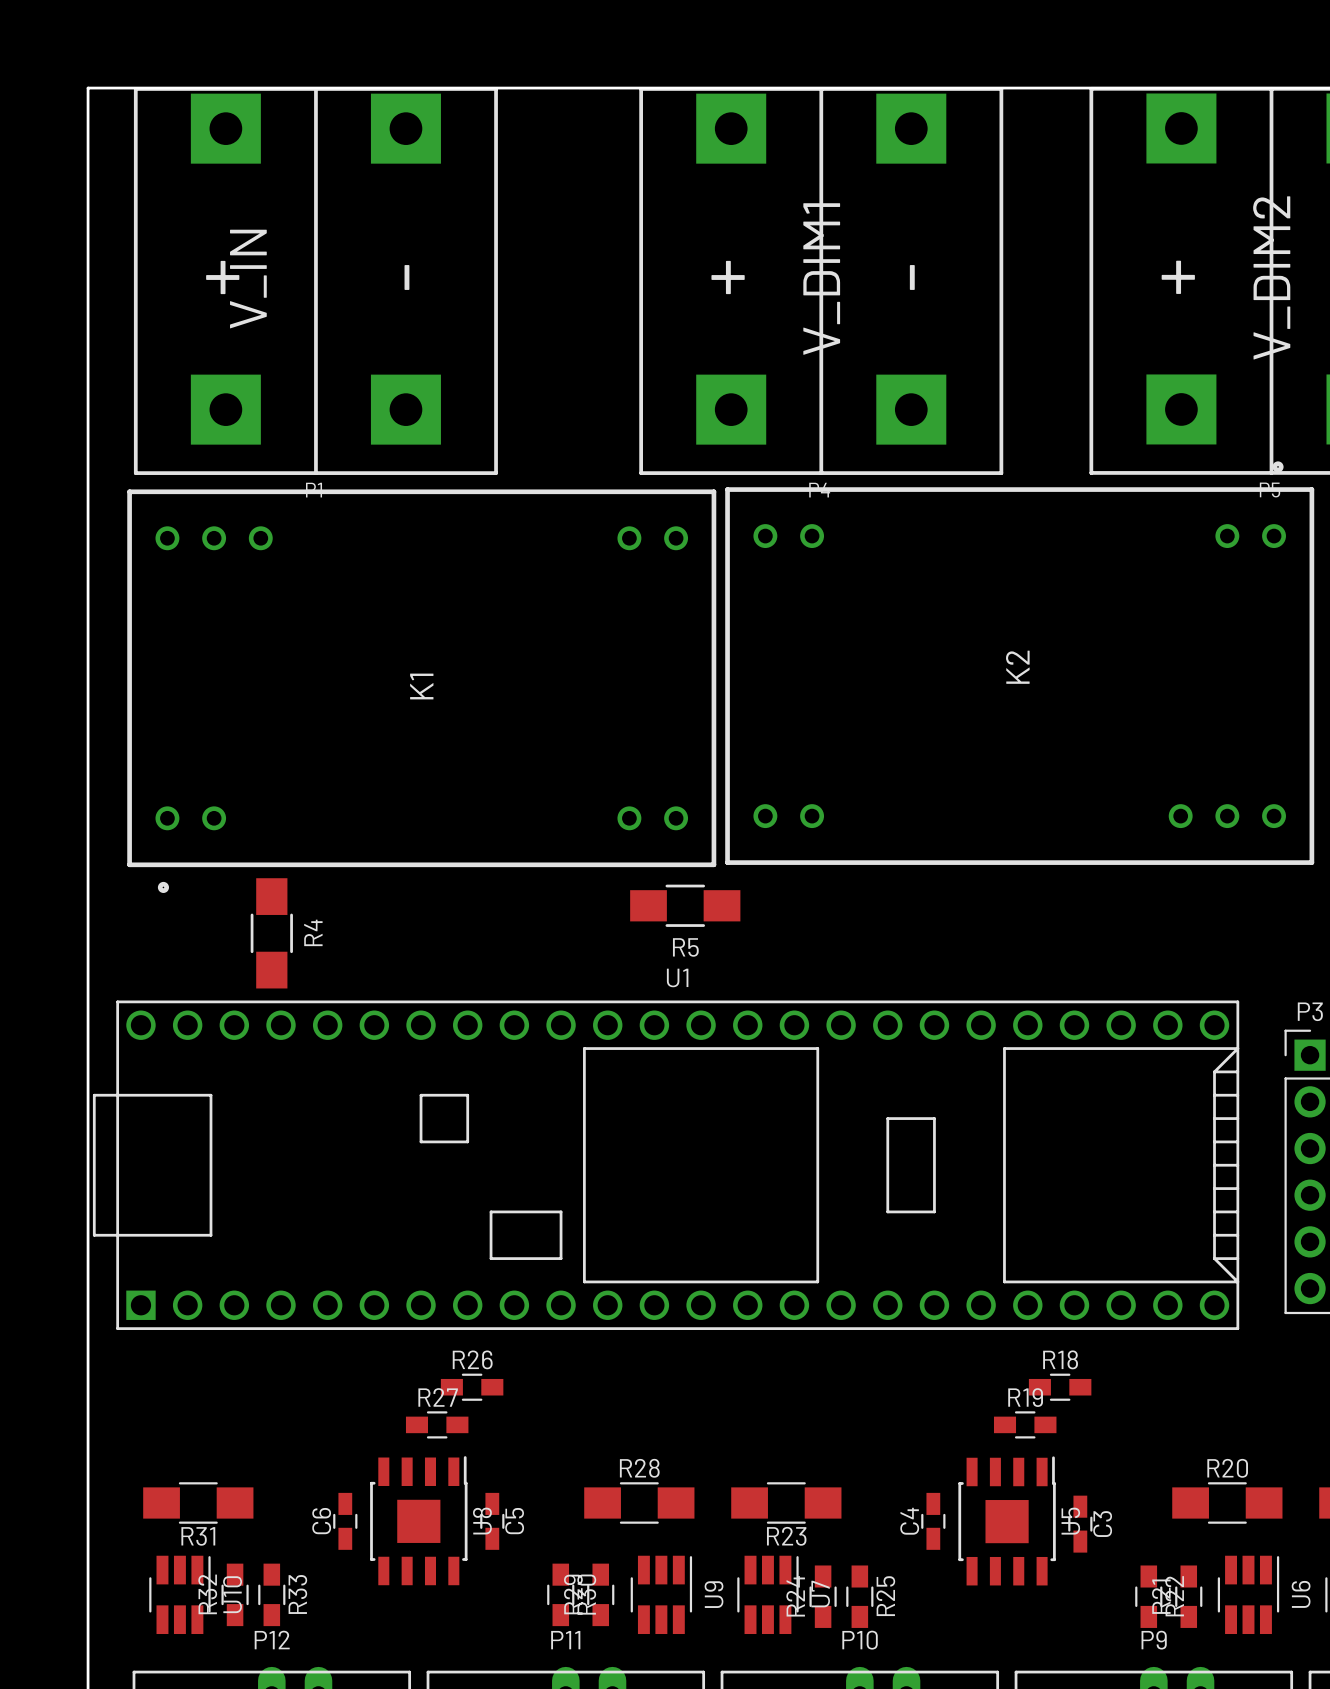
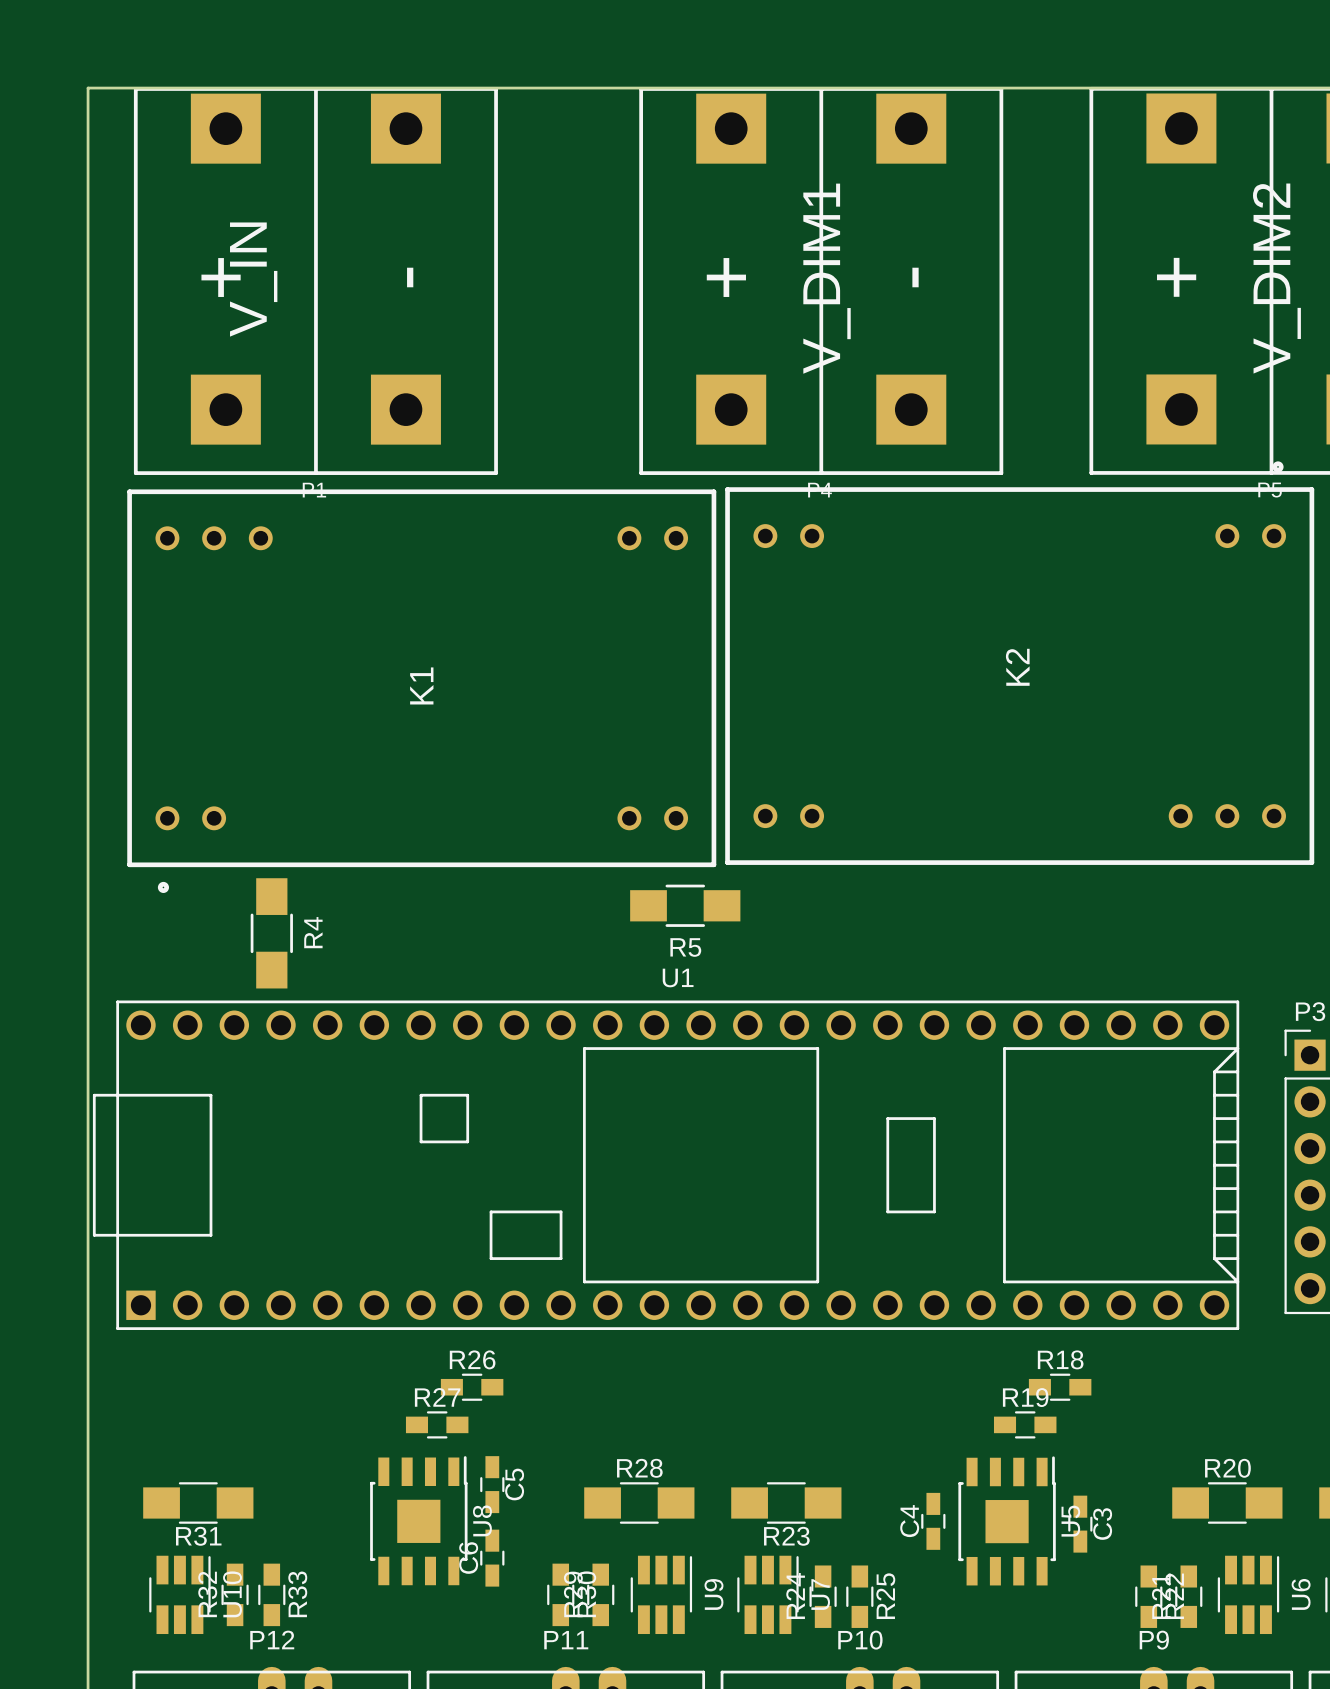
C6 position: (345, 1521) -> (492, 1558)
C5 position: (492, 1521) -> (492, 1484)

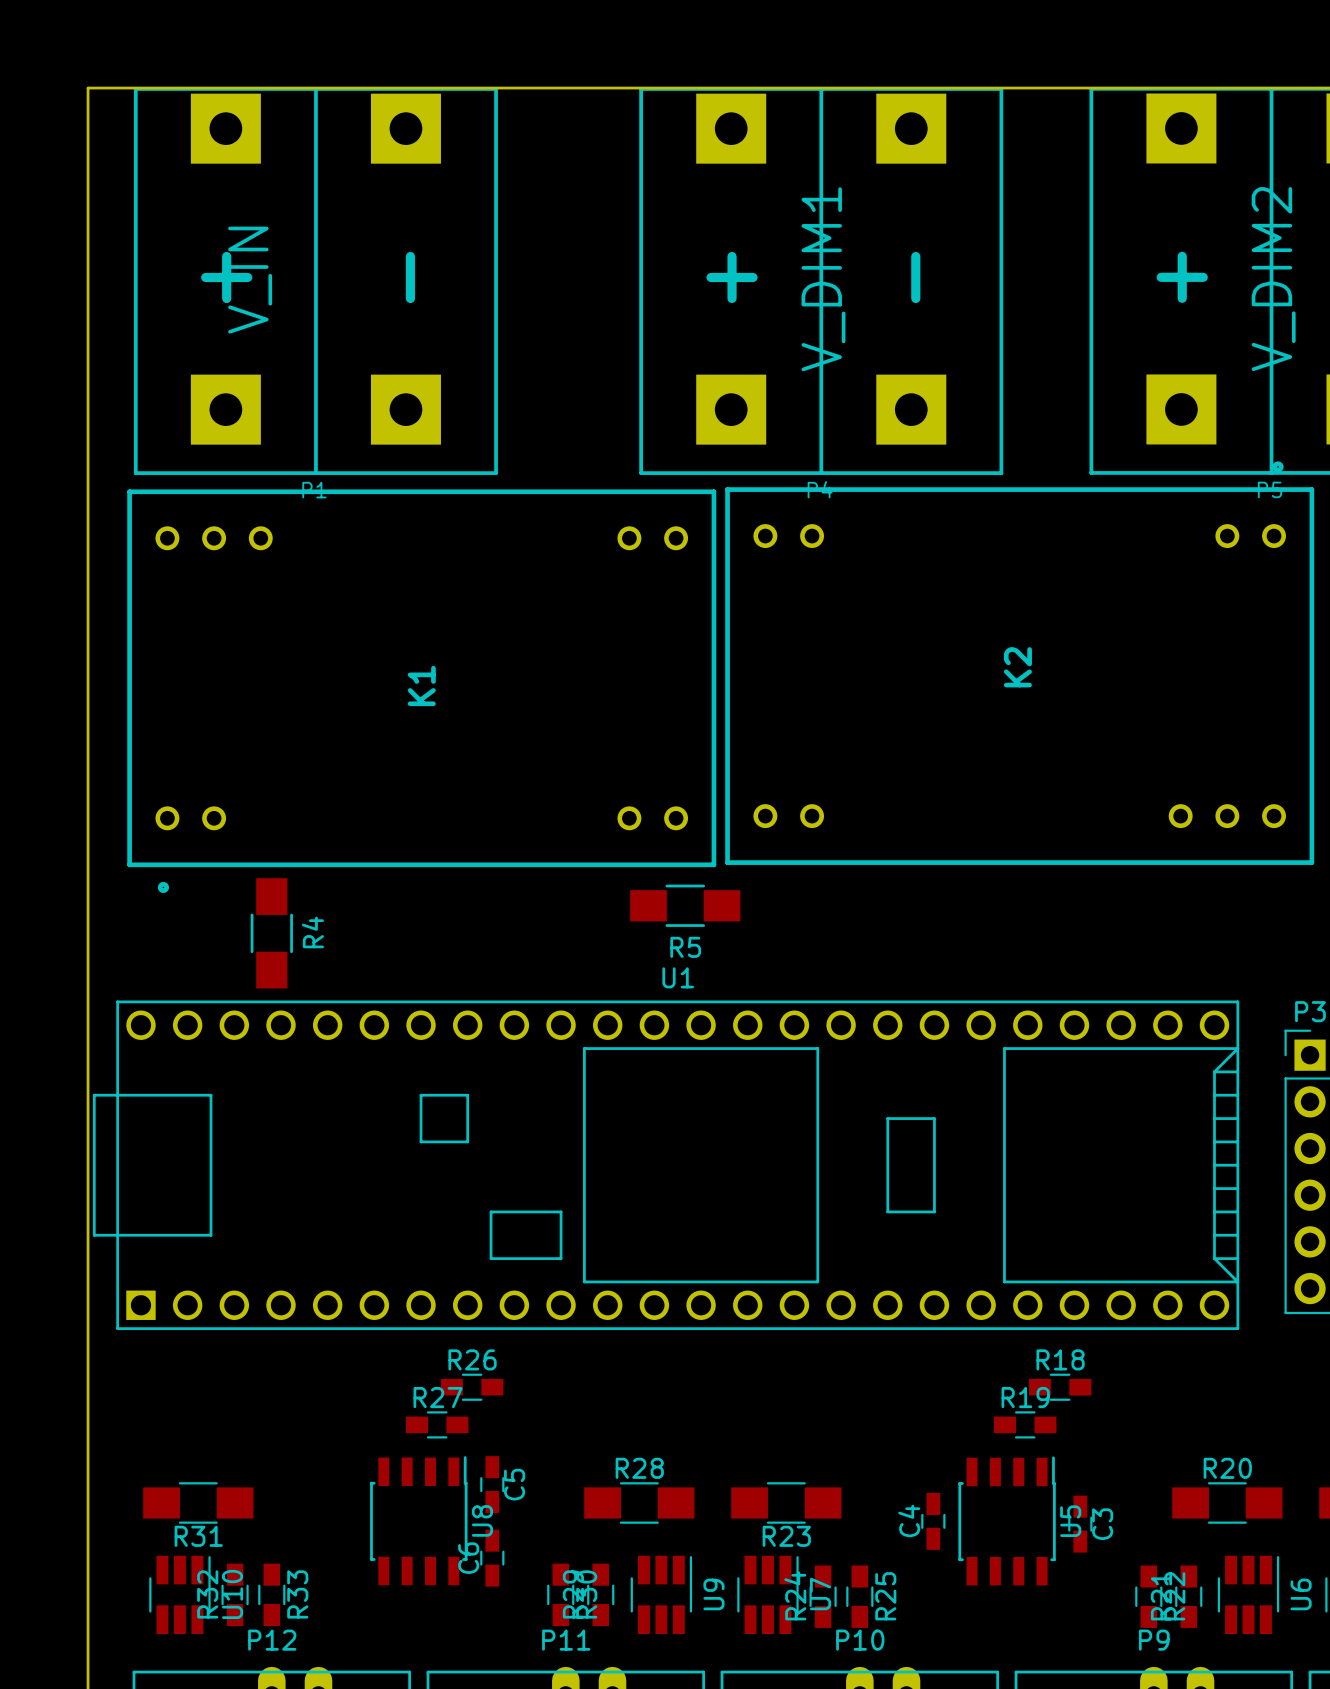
U8 footprint: [370, 1456, 468, 1586] -> [370, 1456, 468, 1586]
U5 footprint: [958, 1456, 1056, 1586] -> [958, 1456, 1056, 1586]

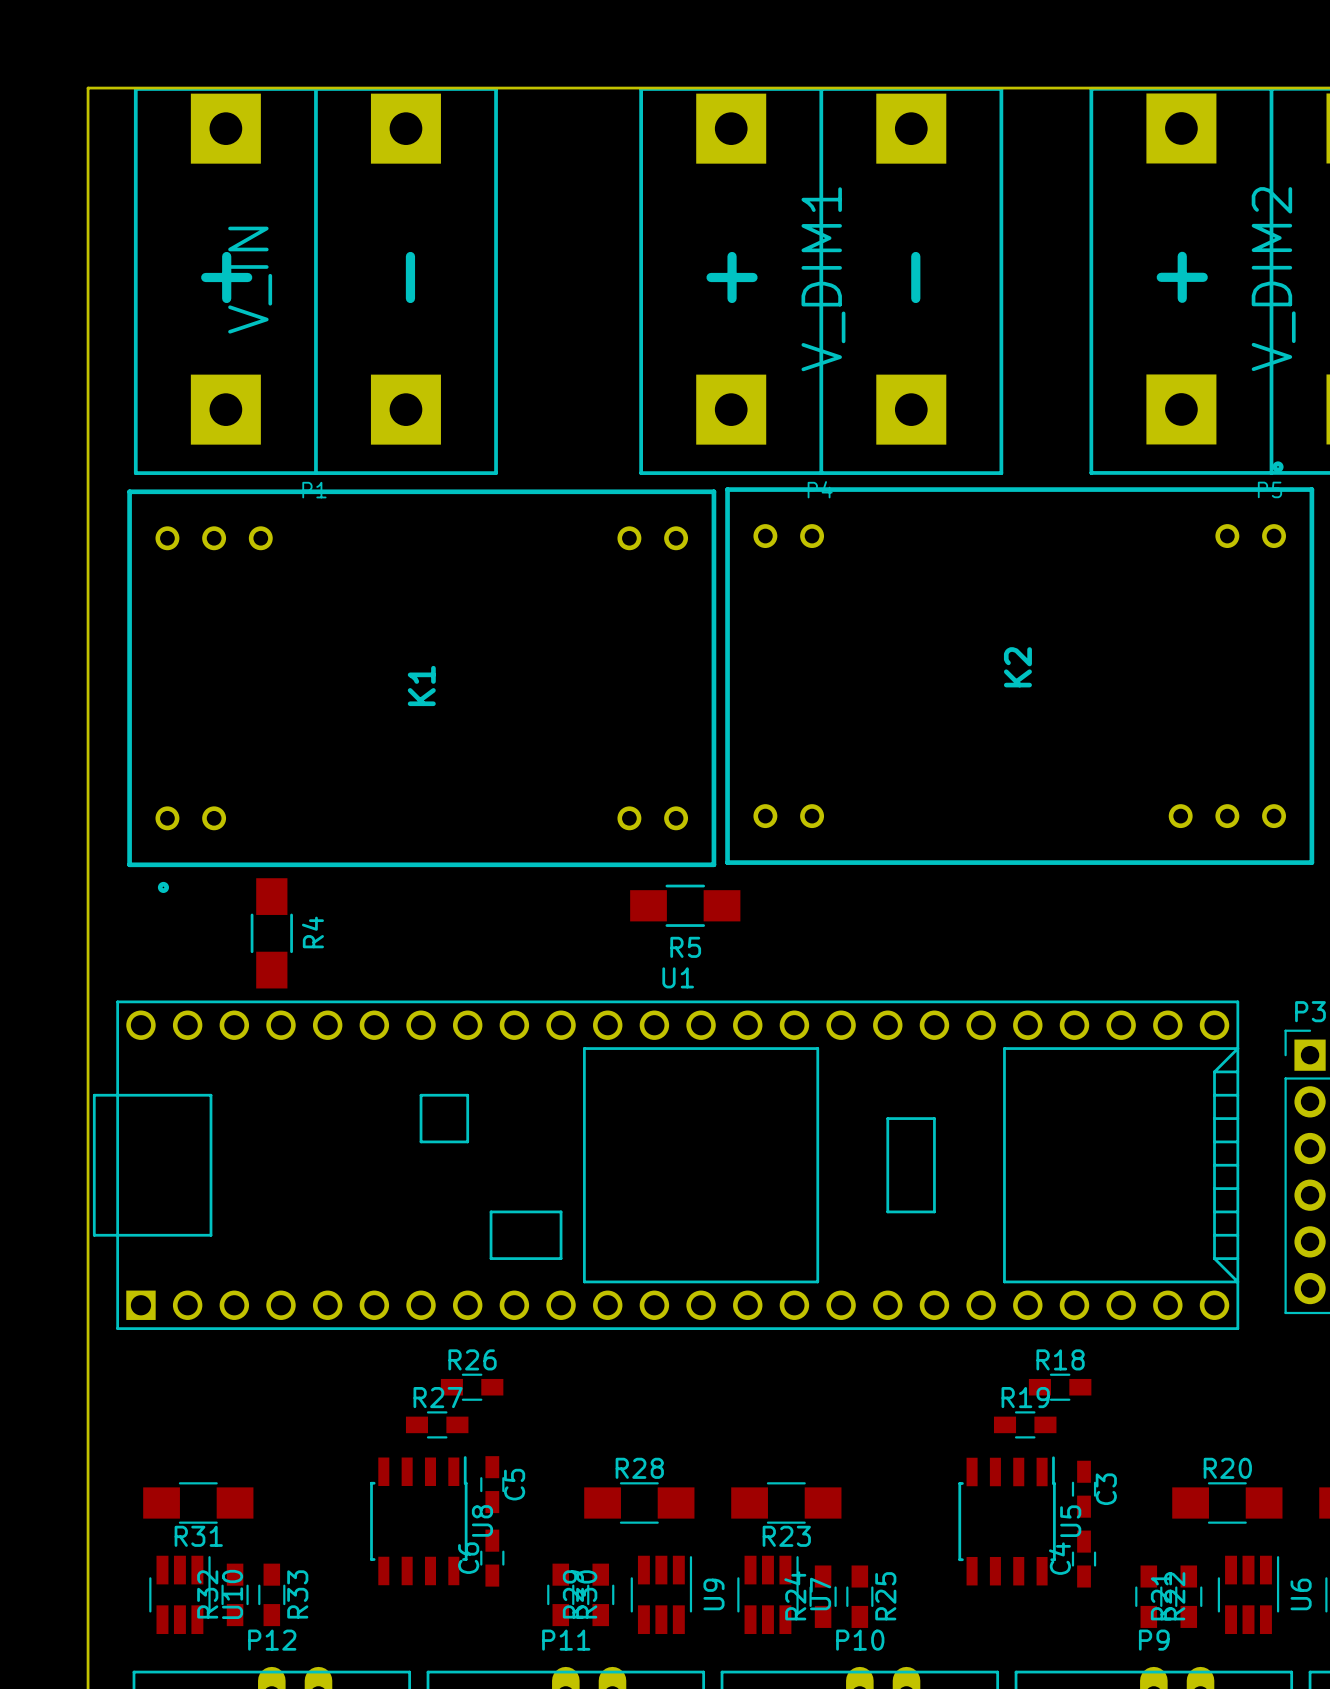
C4 position: (933, 1521) -> (1084, 1559)
C3 position: (1080, 1524) -> (1084, 1489)

